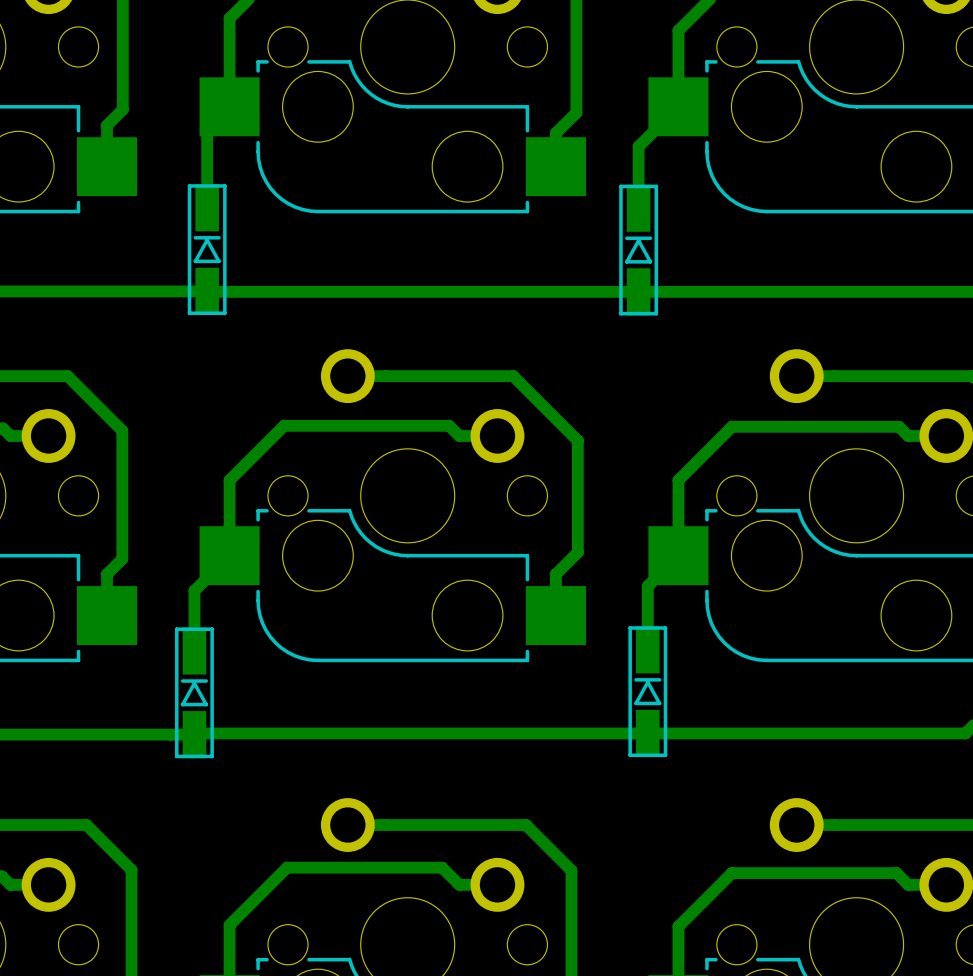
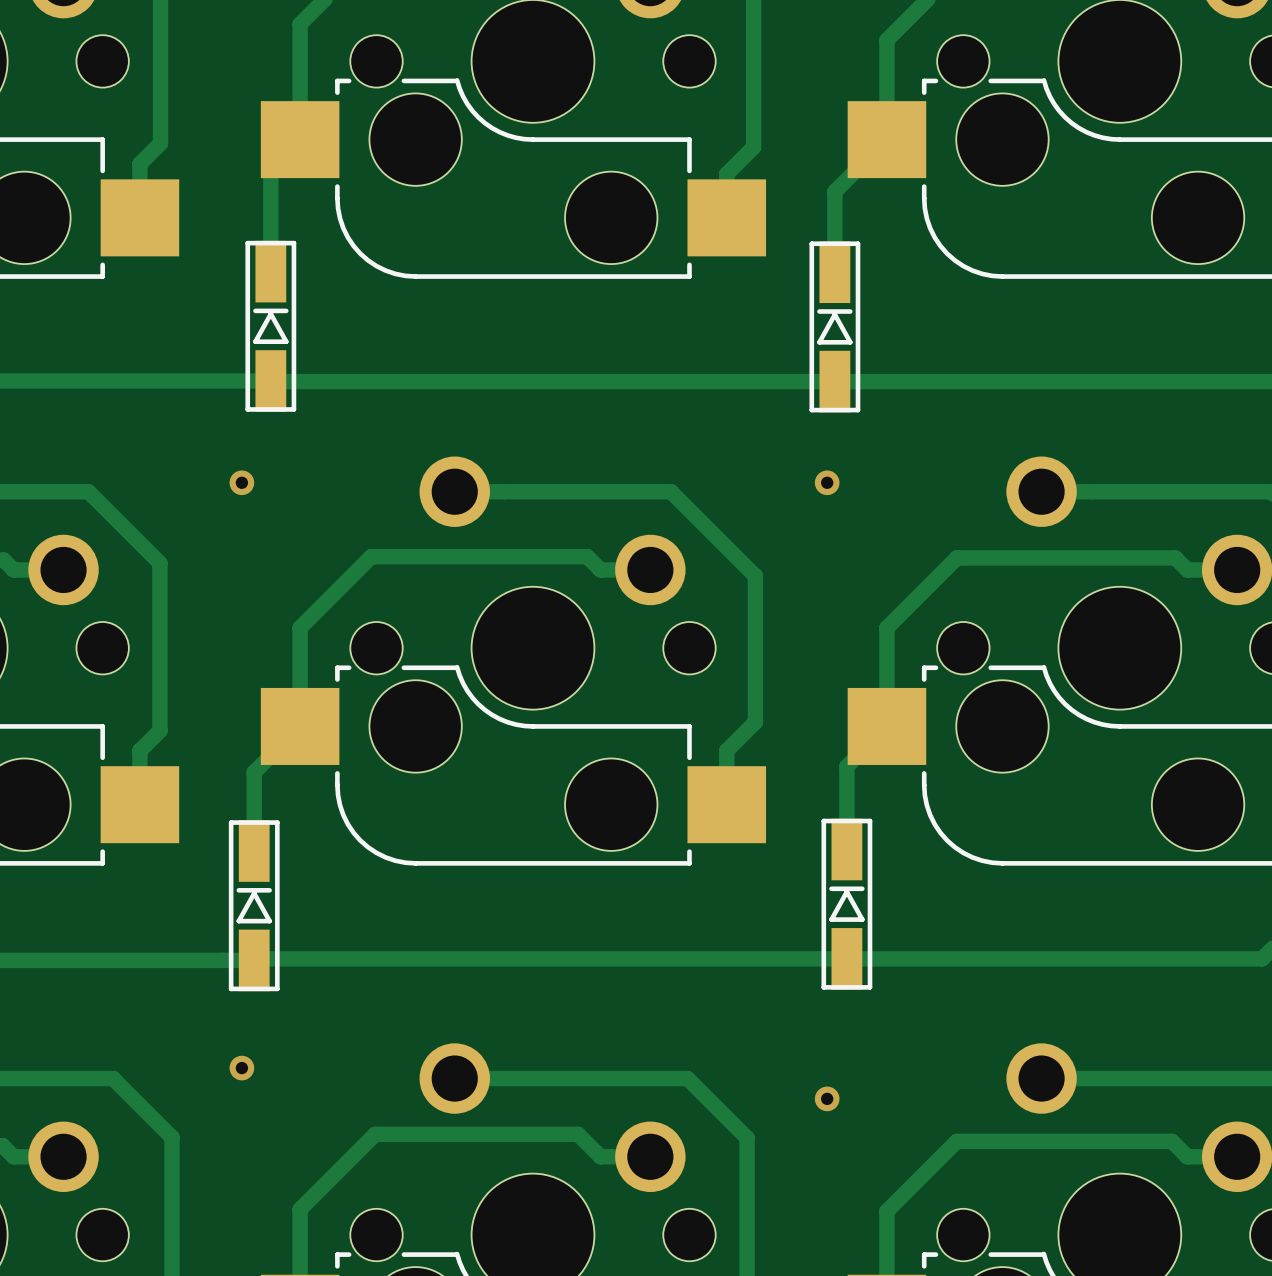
via: none -> (241, 482)
via: none -> (827, 482)
via: none -> (241, 1068)
via: none -> (827, 1098)

